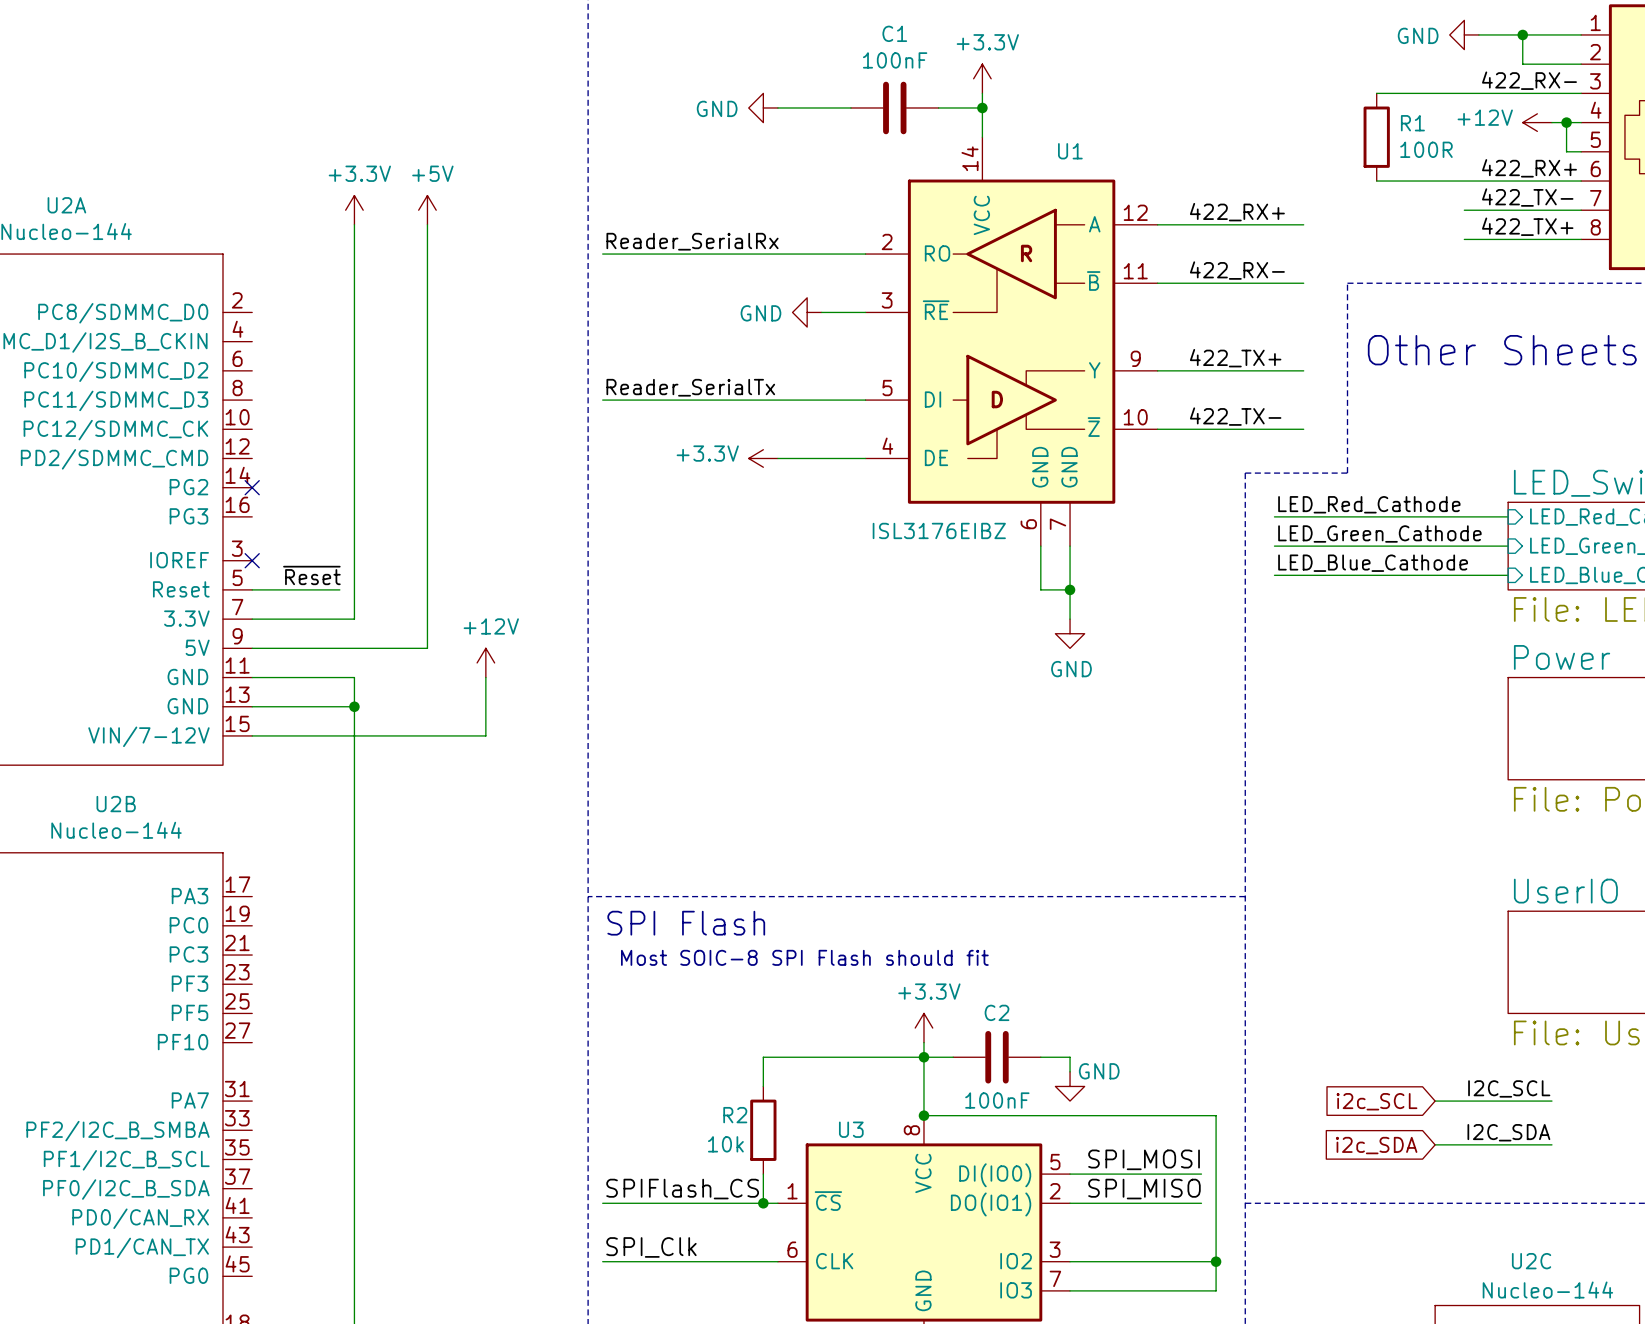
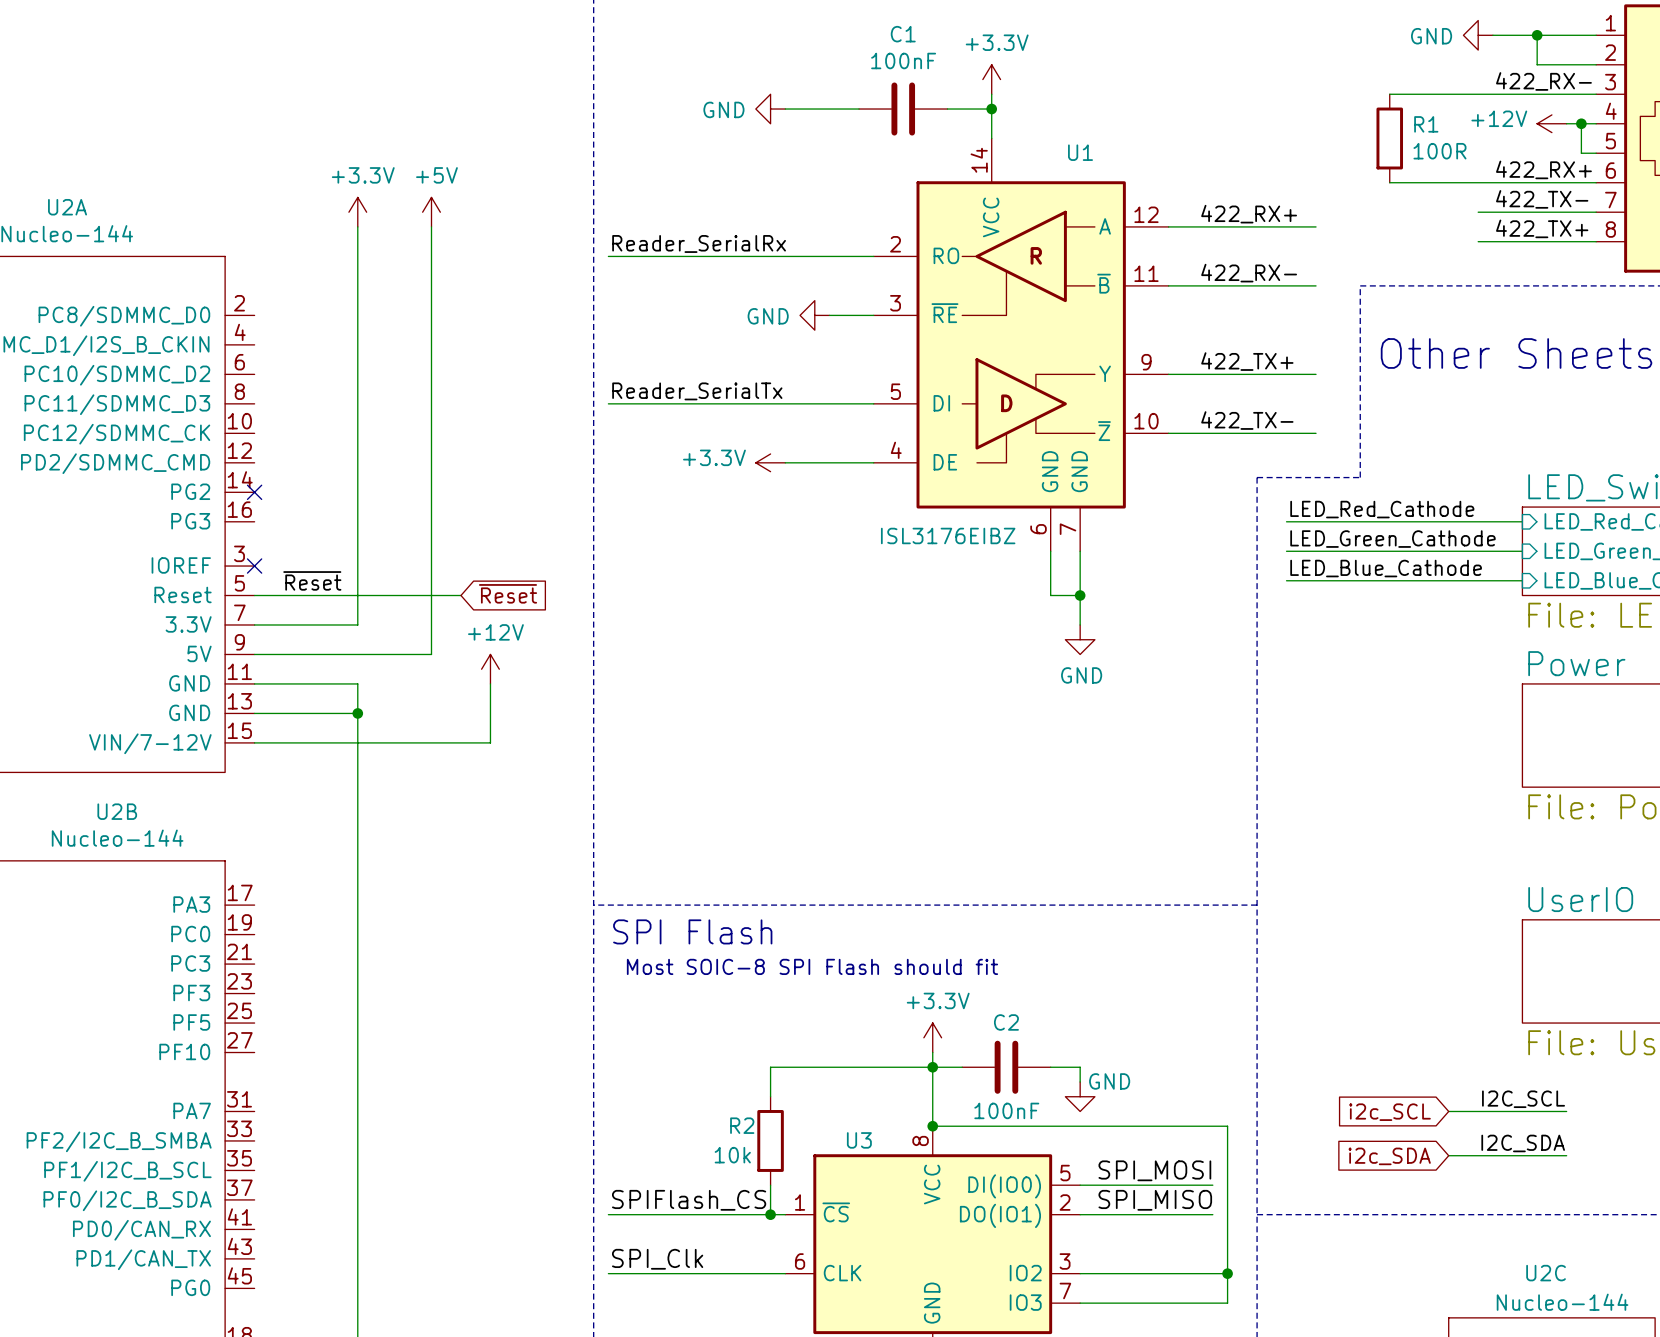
label position: ~{Reset} (311, 575) -> ~{Reset} (312, 580)
global label: none -> ~{Reset} (508, 593)
wire: none -> (343, 595) (460, 595)

